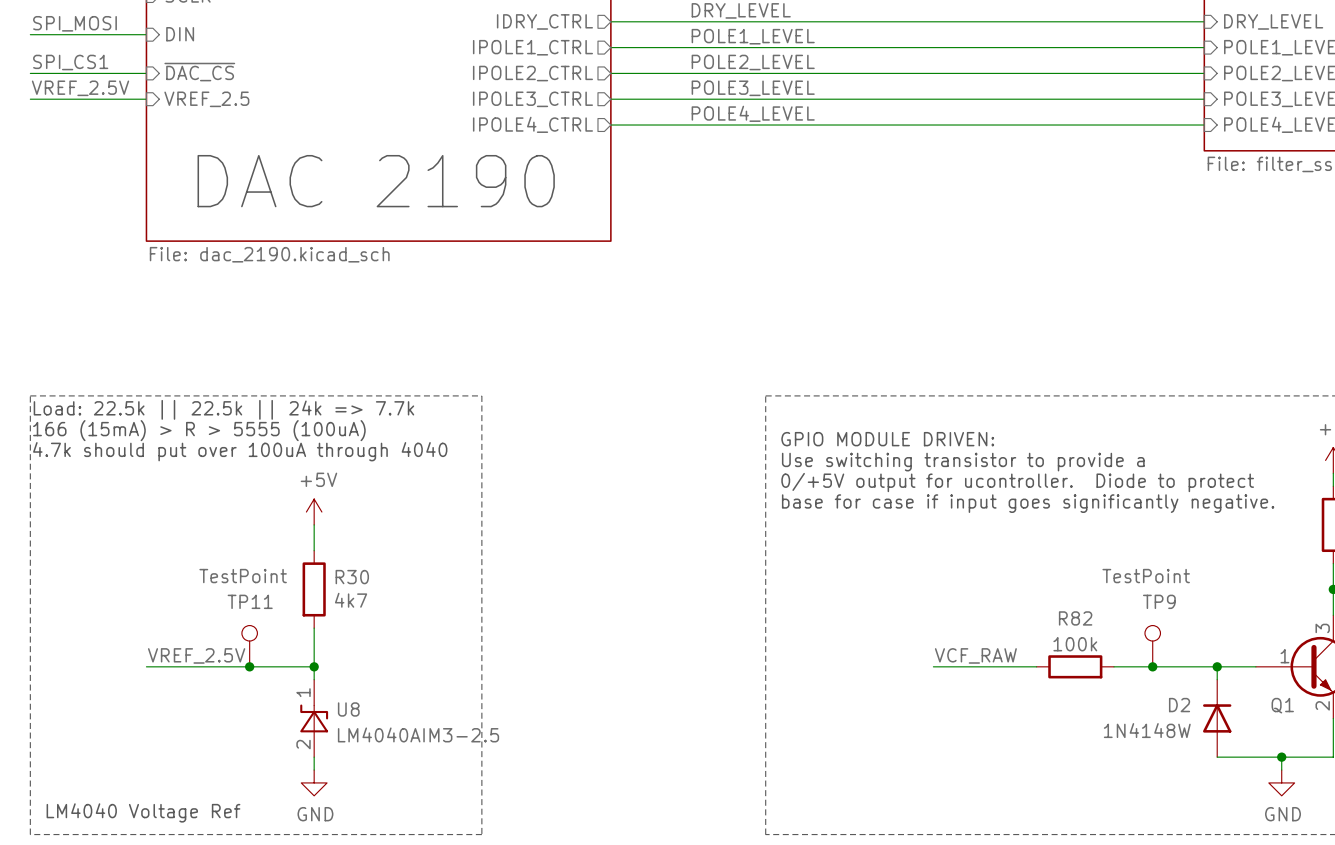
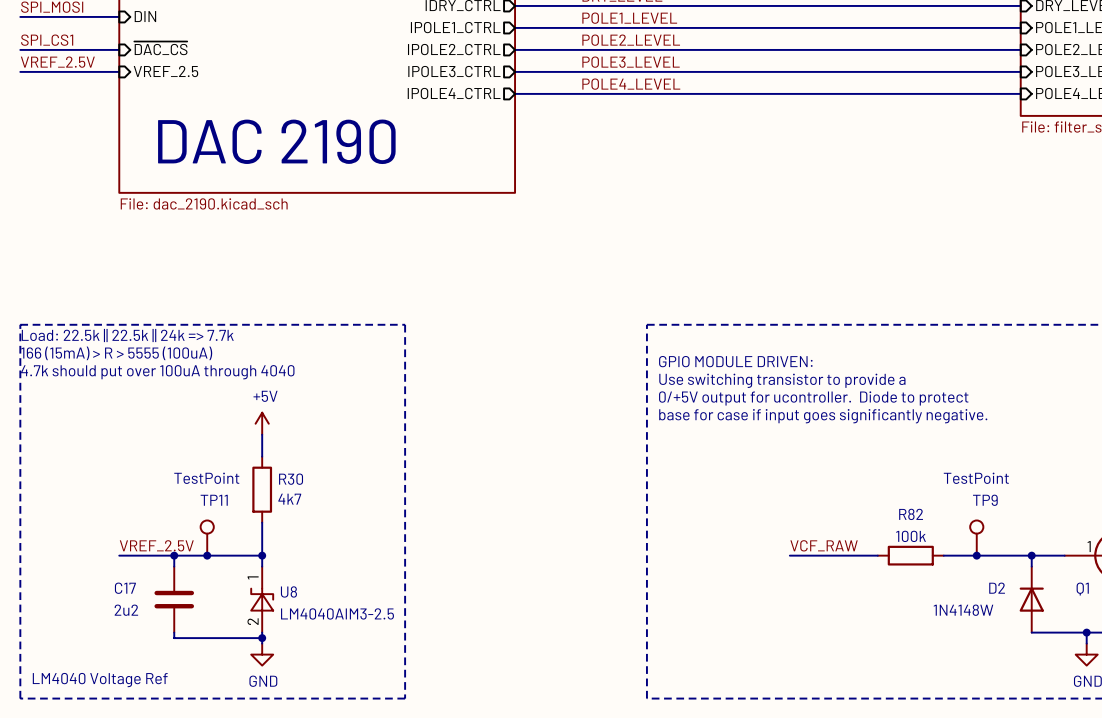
wire: none -> (174, 555) (174, 566)
junction: none -> (174, 555)
C17: none -> 2u2 (174, 599)
wire: none -> (174, 632) (174, 638) (262, 638)
junction: none -> (262, 638)

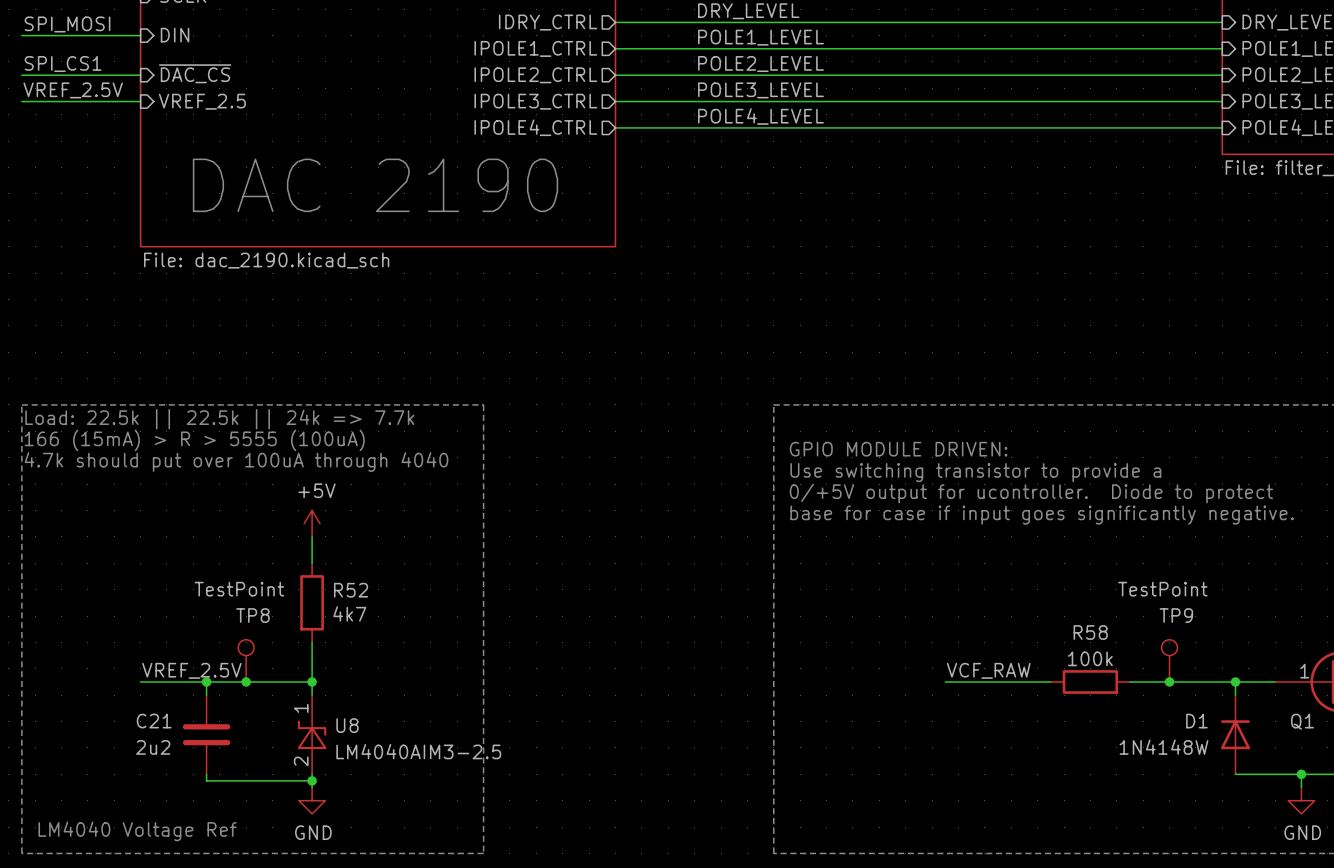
R30 name: R30 (291, 479) -> R52 (351, 590)
TP11 name: TP11 (214, 500) -> TP8 (252, 615)
R82 name: R82 (911, 514) -> R58 (1090, 632)
C17 name: C17 (125, 588) -> C21 (154, 721)
D2 name: D2 (997, 588) -> D1 (1196, 721)

